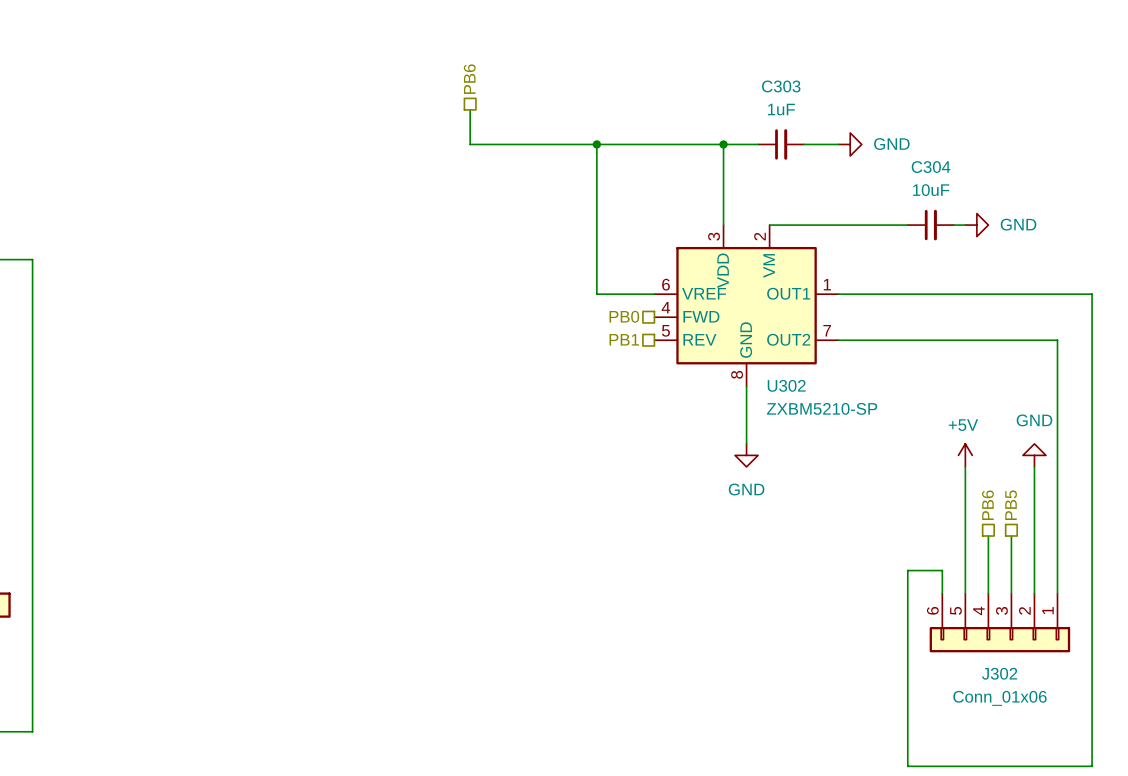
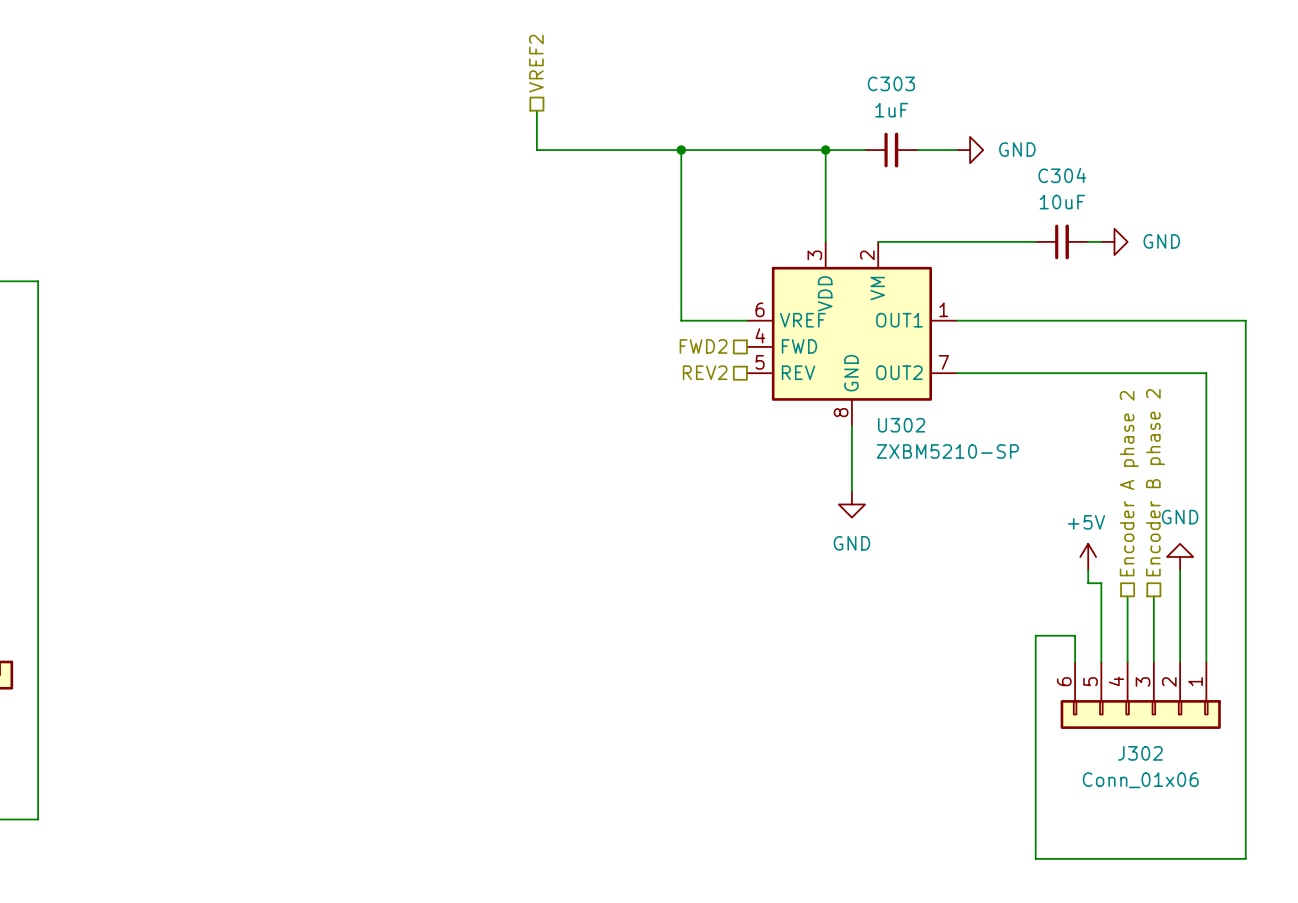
hierarchical label: PB6 (469, 79) -> VREF2 (536, 63)
hierarchical label: PB0 (624, 316) -> FWD2 (703, 346)
hierarchical label: PB1 (624, 339) -> REV2 (705, 372)
power symbol position: +5V (965, 455) -> +5V (1088, 556)
power symbol position: GND (1034, 455) -> GND (1180, 556)
wire: (965, 466) (965, 524) -> (1088, 570) (1088, 583) (1101, 583)
wire: (1034, 466) (1034, 512) -> none
hierarchical label: PB6 (987, 505) -> Encoder A phase 2 (1129, 483)
hierarchical label: PB5 (1011, 505) -> Encoder B phase 2 (1155, 482)

